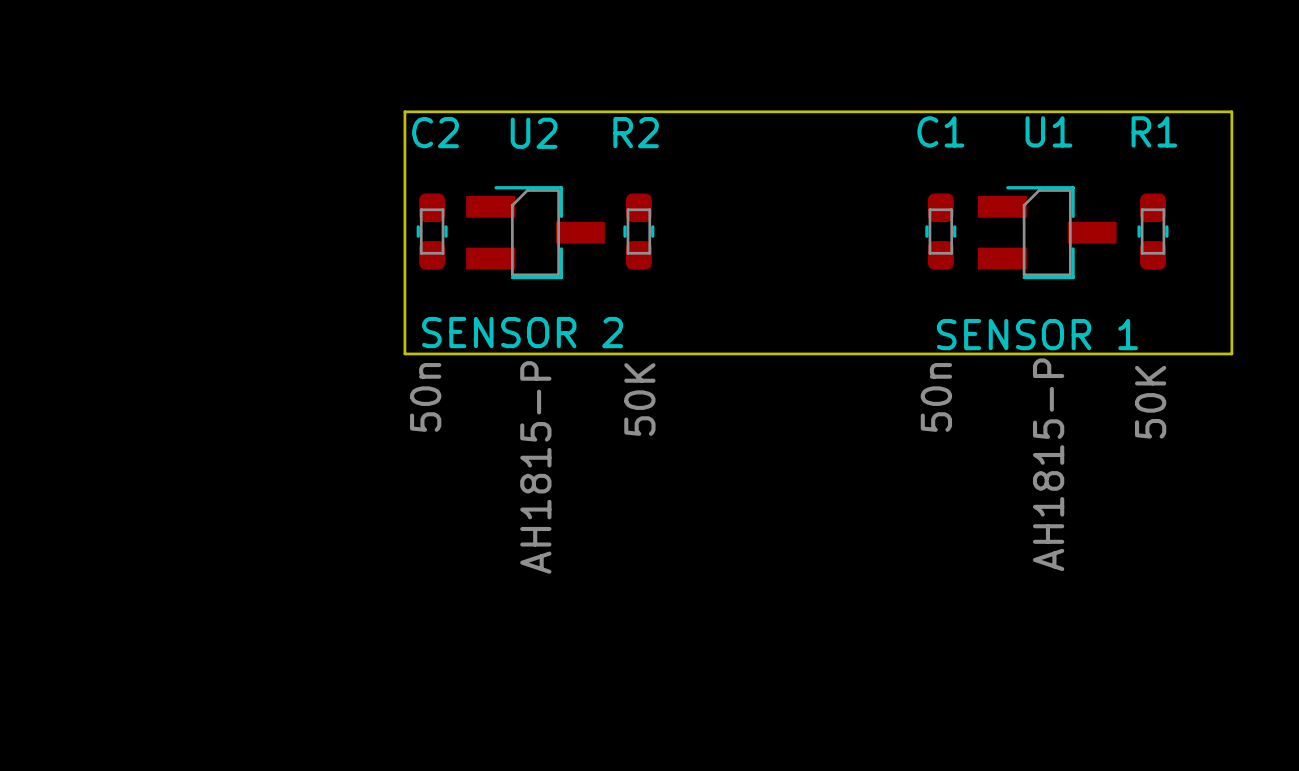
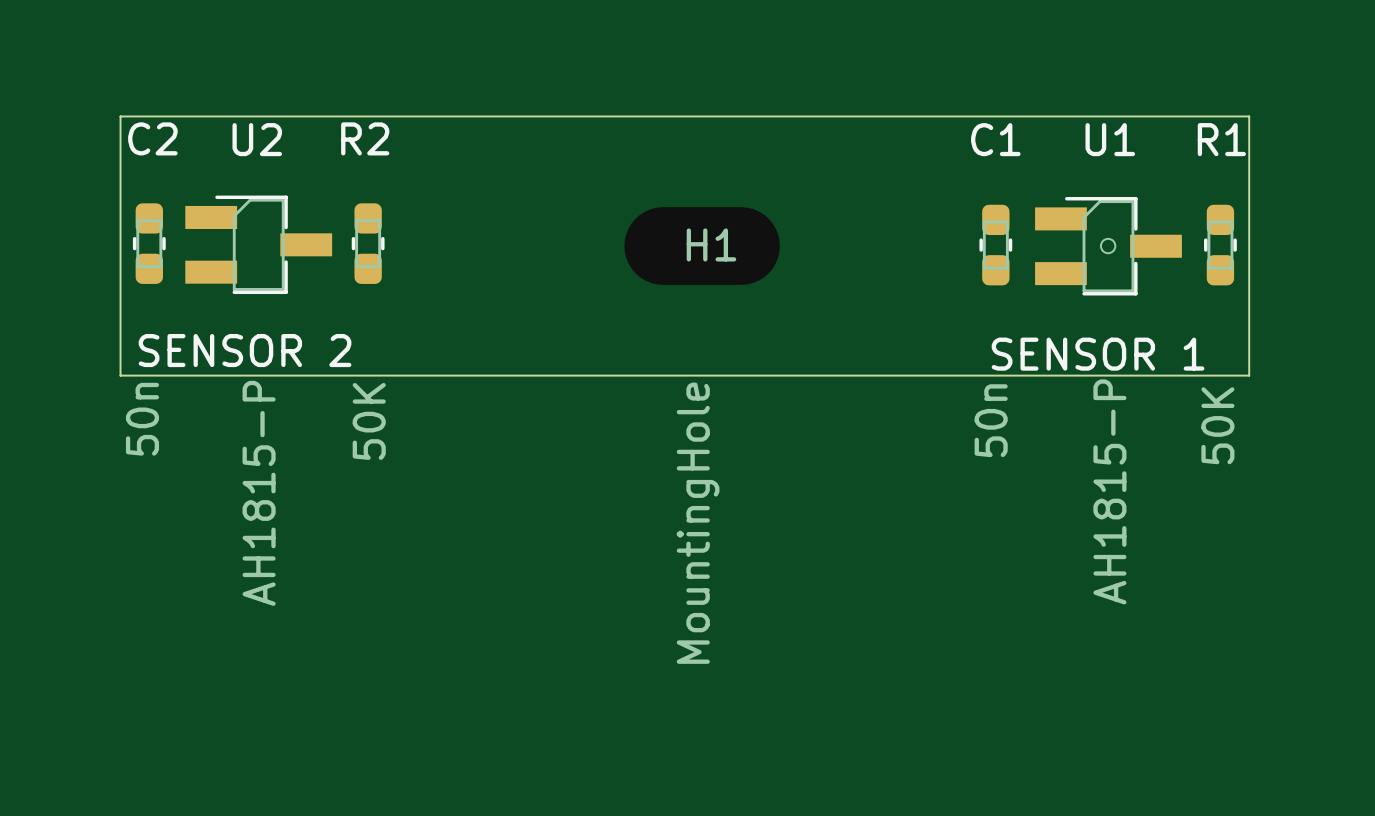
board edge: (404, 111) (1231, 111) (1231, 353) (404, 353) (404, 111) -> (120, 116) (120, 375) (1249, 375) (1249, 116) (120, 116)
drawing: none -> [1100, 238, 1117, 254]
C2 position: (432, 231) -> (149, 243)
R2 position: (638, 231) -> (368, 243)
U2 position: (535, 232) -> (258, 244)
H1: none -> MountingHole (702, 246)
text position: SENSOR 2 (522, 332) -> SENSOR 2 (245, 350)

